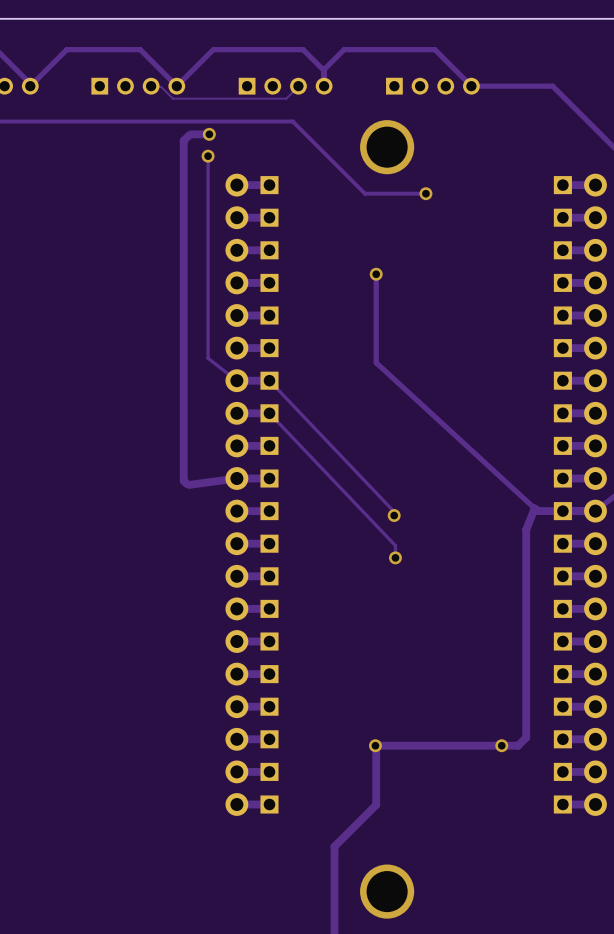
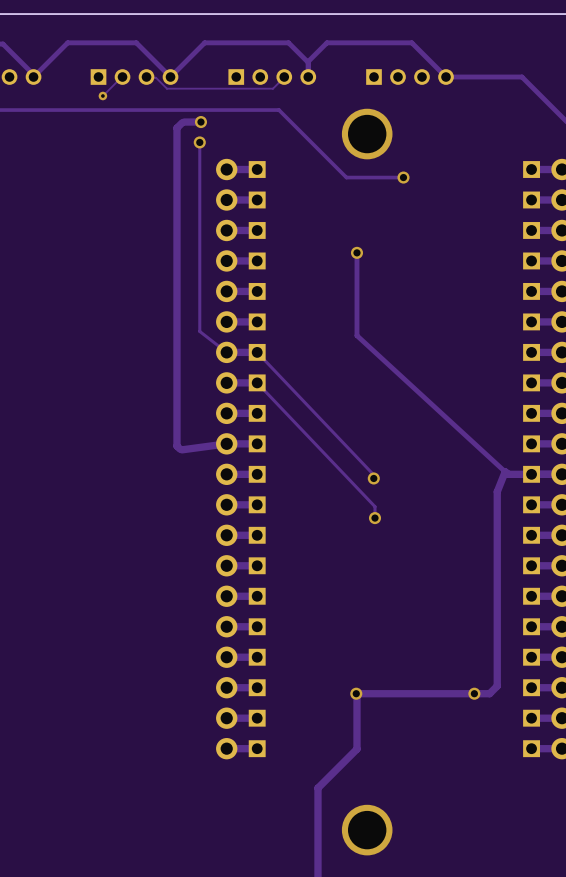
track: none -> (122, 77) (102, 95)
via: none -> (102, 95)

